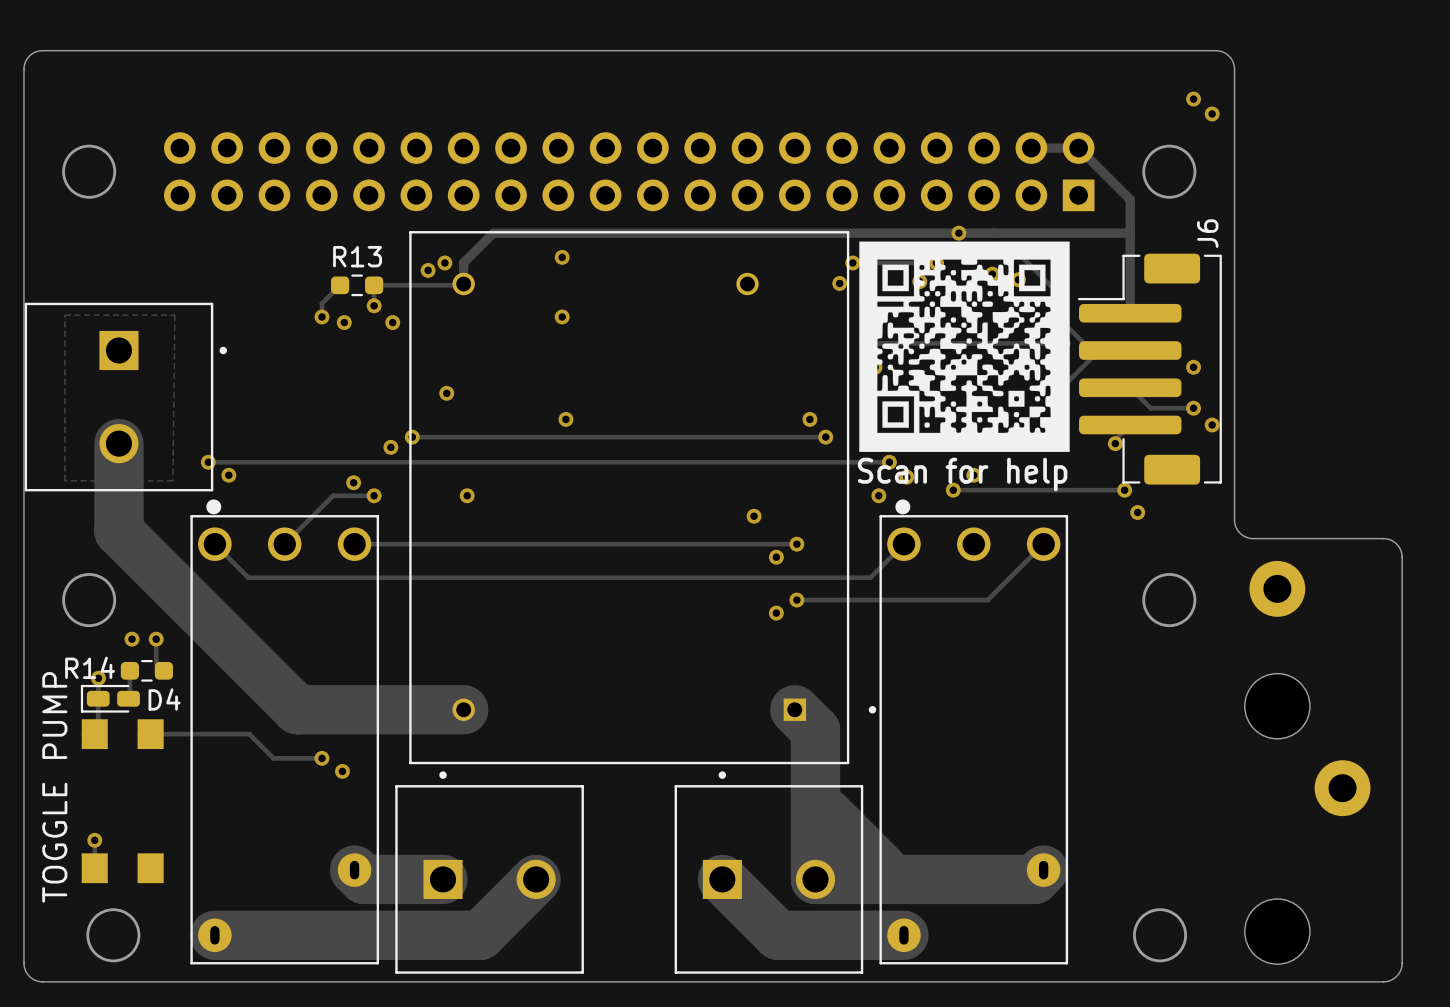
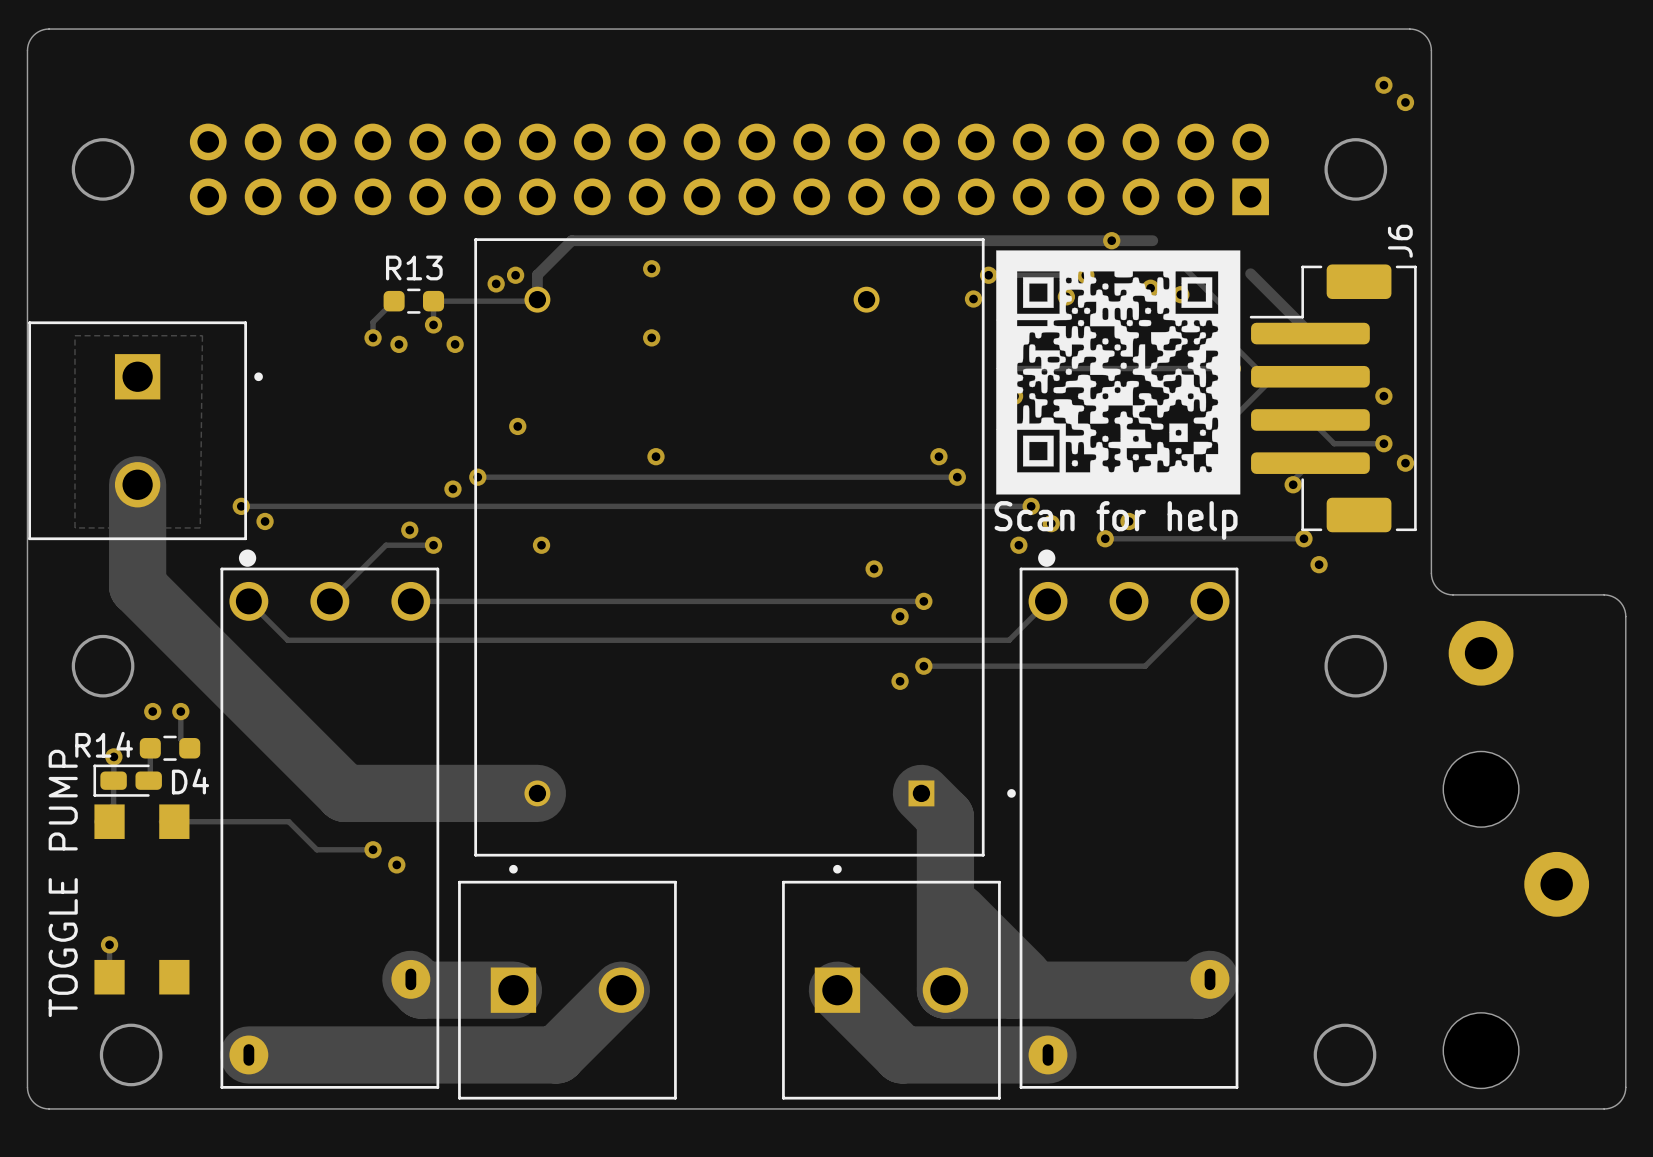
track: (1031, 148) (1078, 148) (1130, 199) (1130, 313) -> (1250, 273) (1310, 333)
track: (994, 233) (1130, 233) -> none

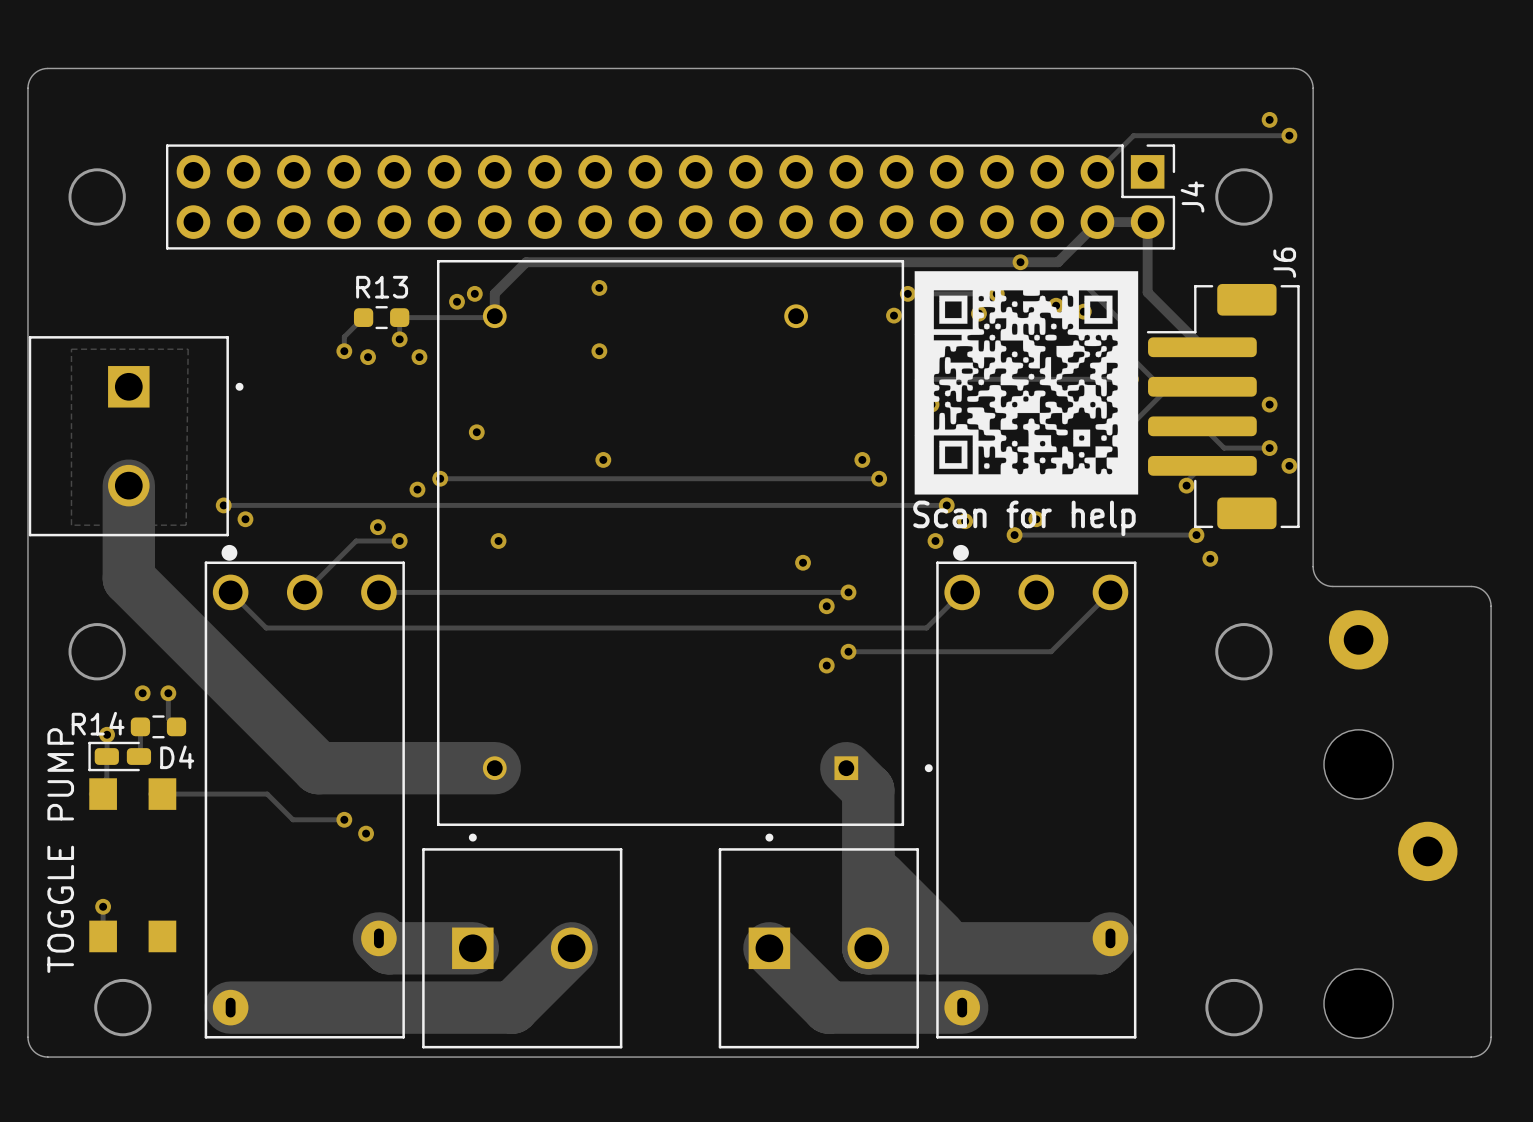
track: none -> (1289, 135) (1133, 135) (1097, 171)
J4 side: bottom (729, 169) -> top (670, 196)
track: none -> (1097, 222) (1147, 222) (1147, 292)
track: none -> (1097, 222) (1058, 262)

